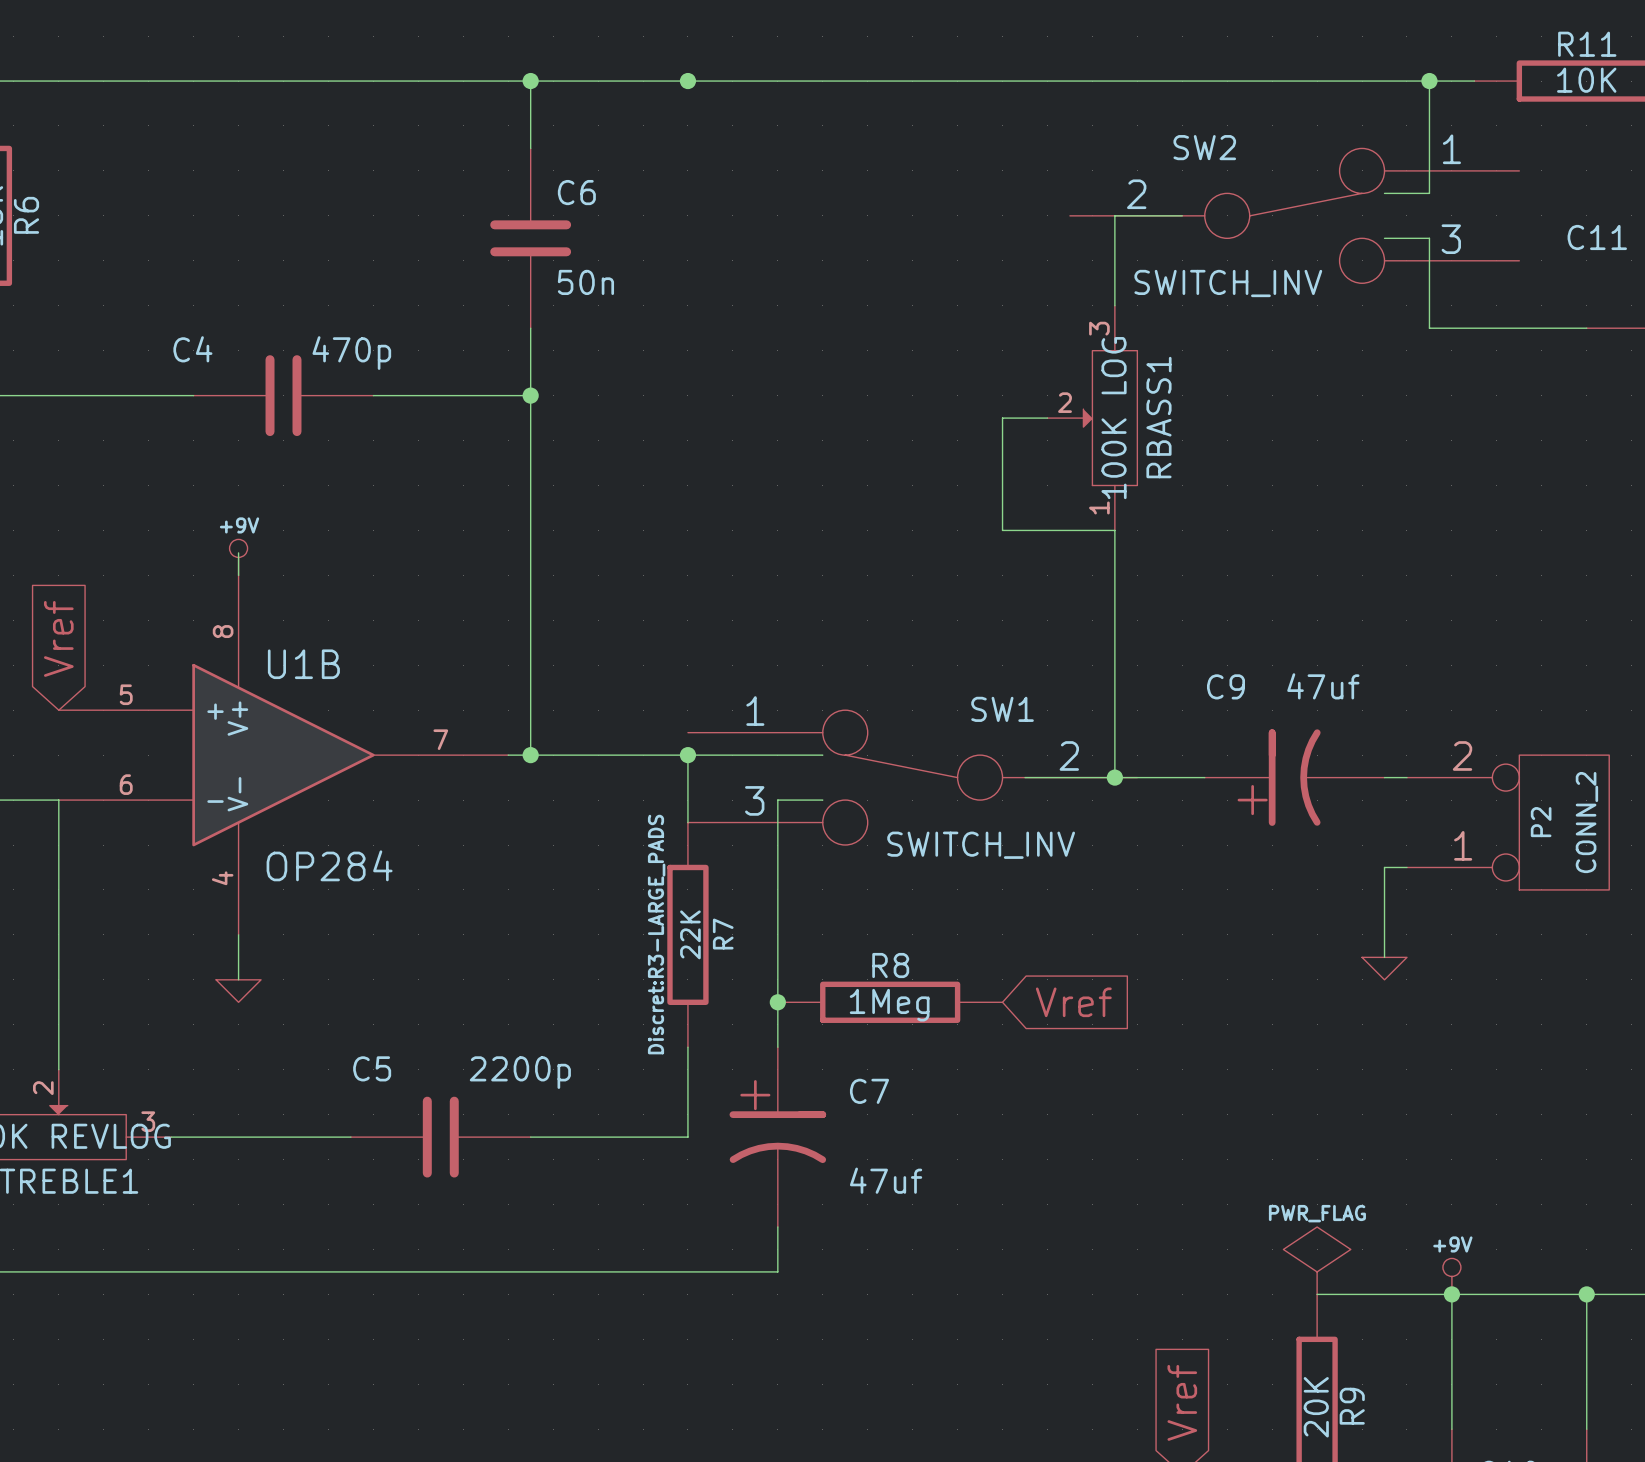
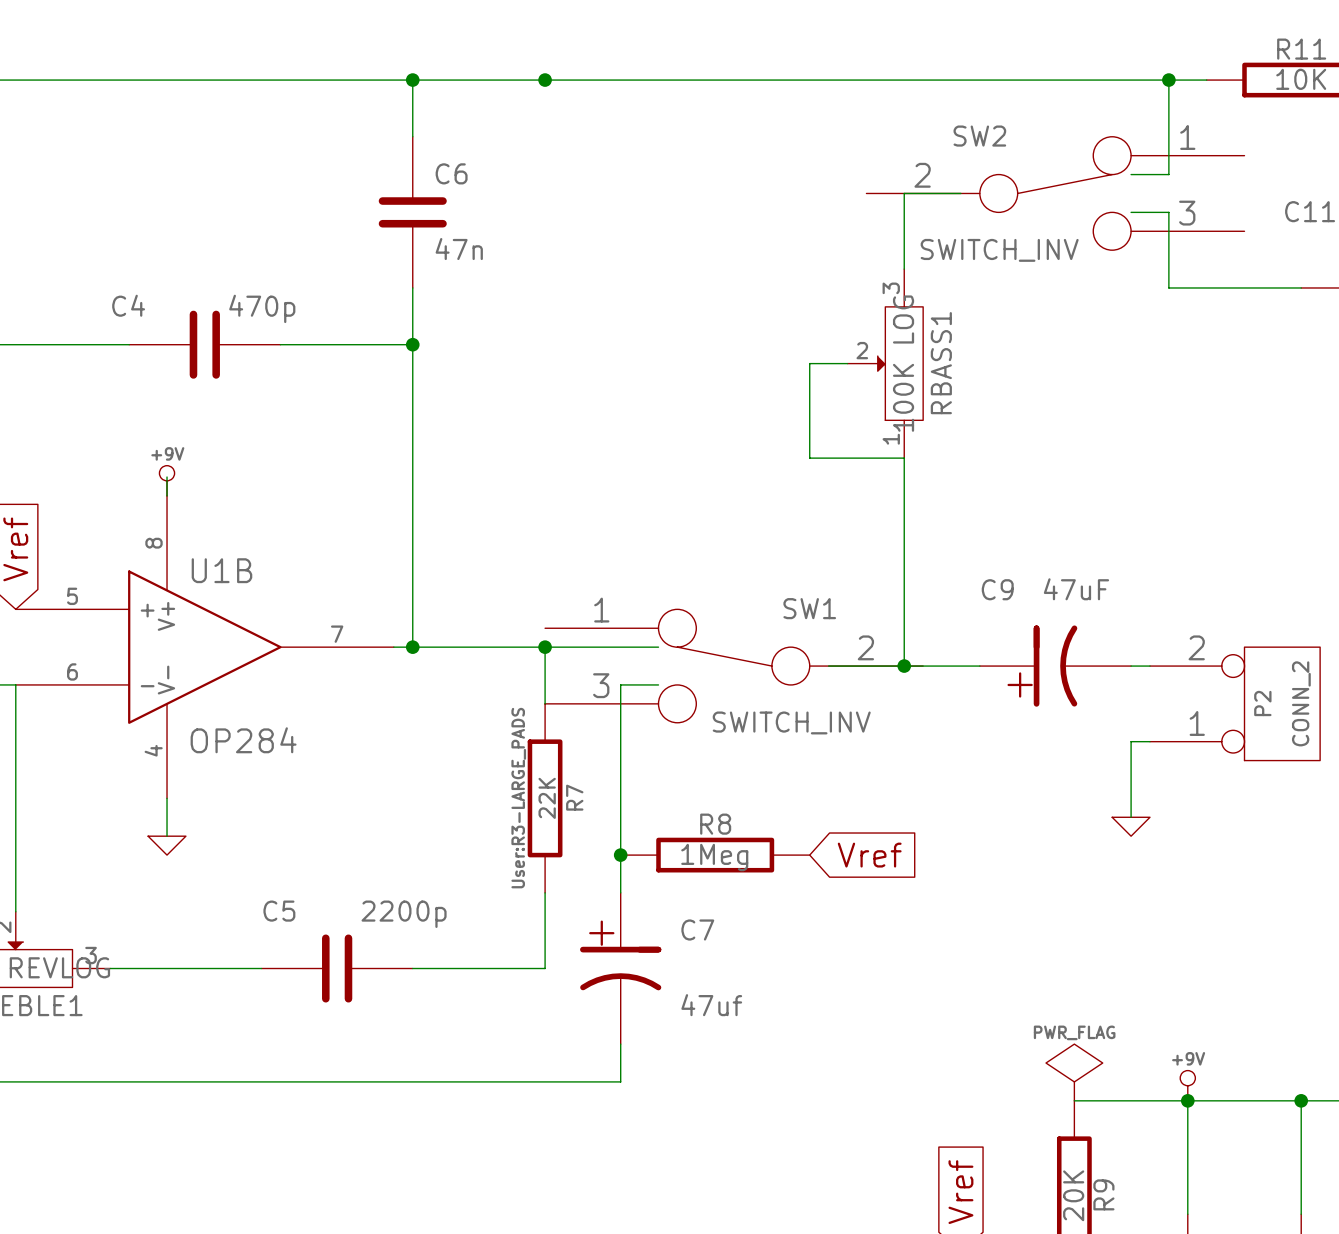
C6 value: 50n (585, 282) -> 47n (459, 249)
C9 value: 47uf (1323, 686) -> 47uF (1076, 589)
R7 text: Discret:R3-LARGE_PADS (656, 934) -> User:R3-LARGE_PADS (518, 798)

